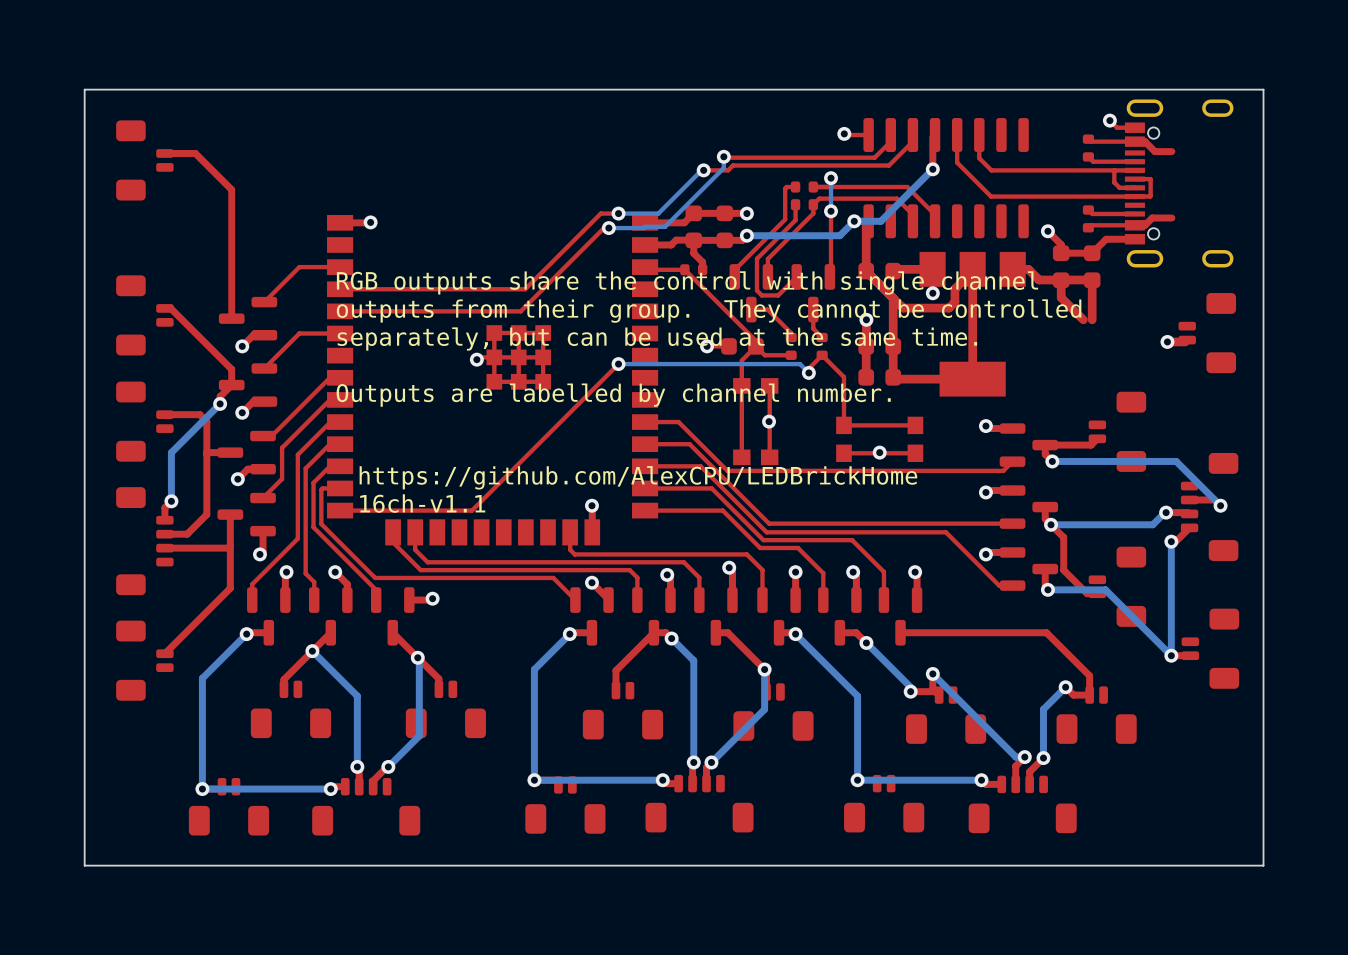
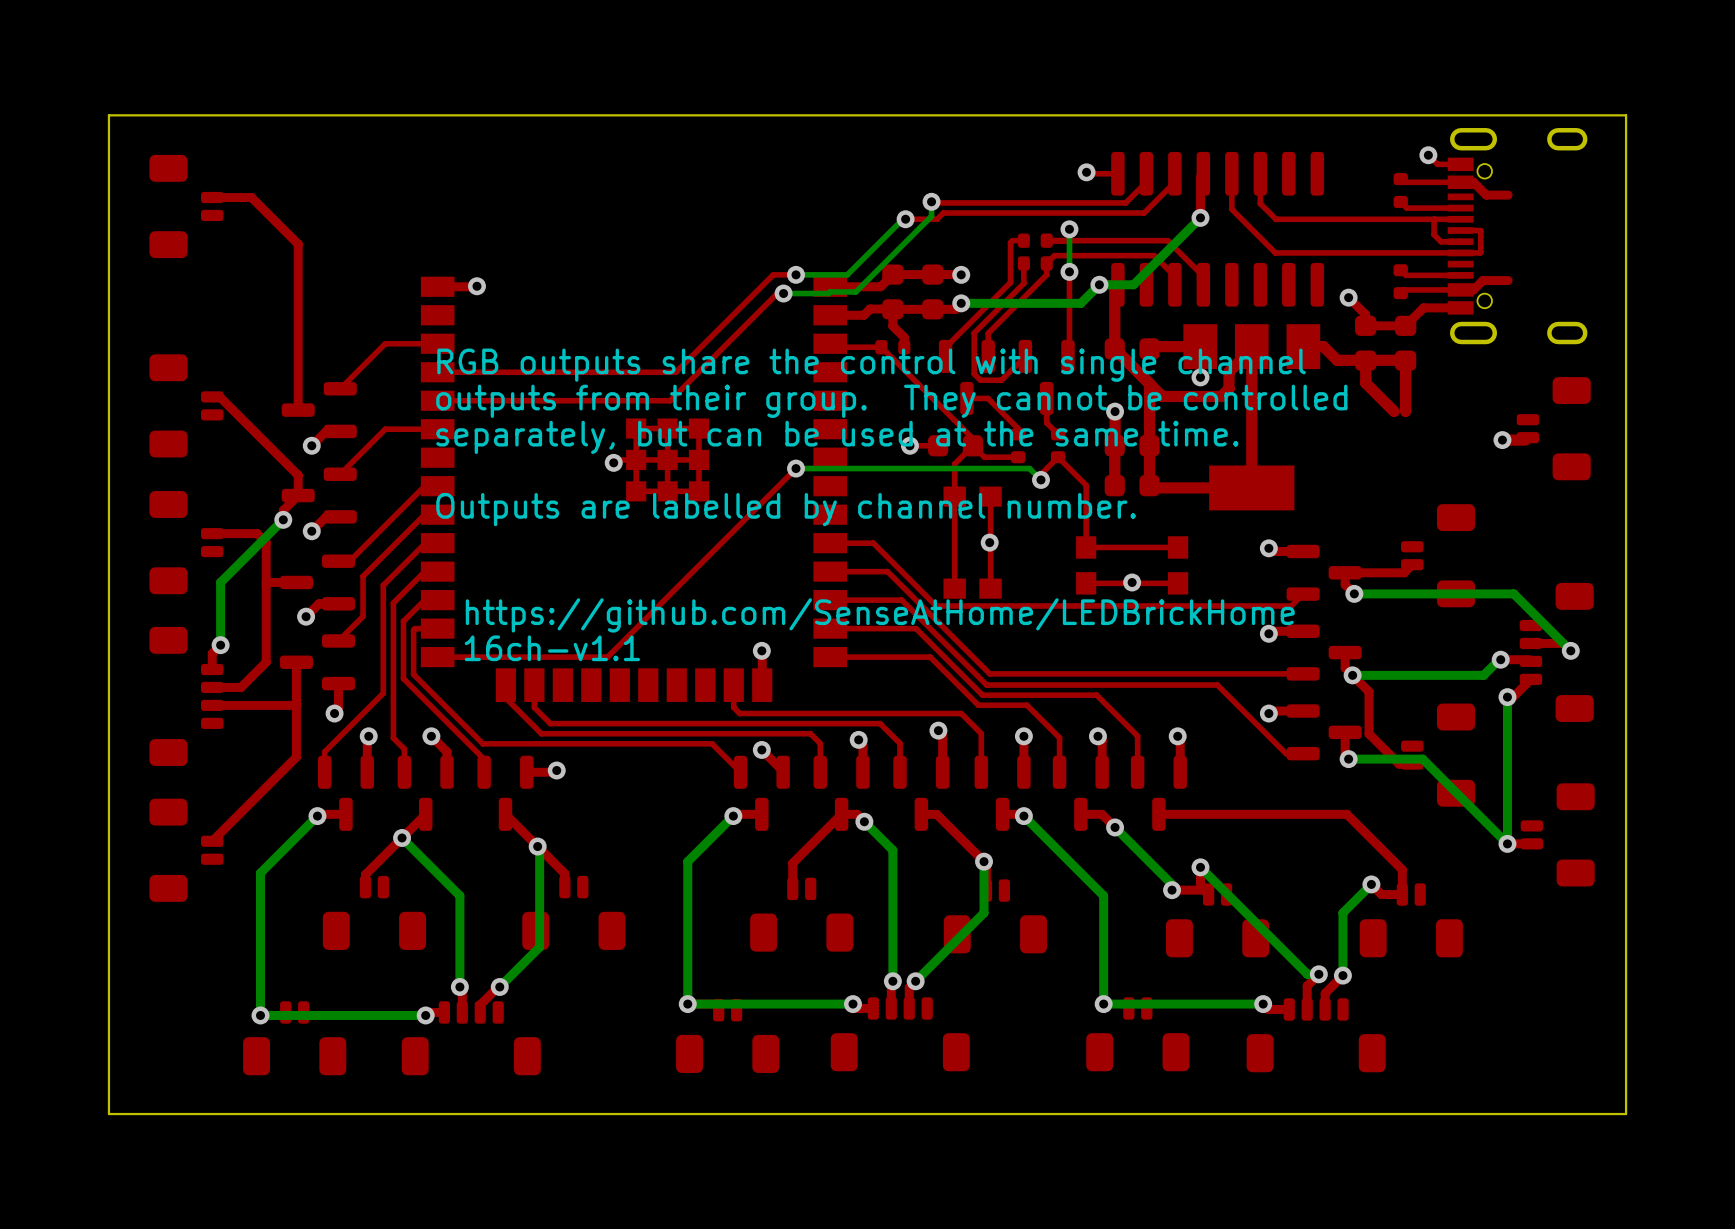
text: https://github.com/AlexCPU/LEDBrickHome (638, 477) -> https://github.com/SenseAtHome/LEDBrickHome (880, 615)

